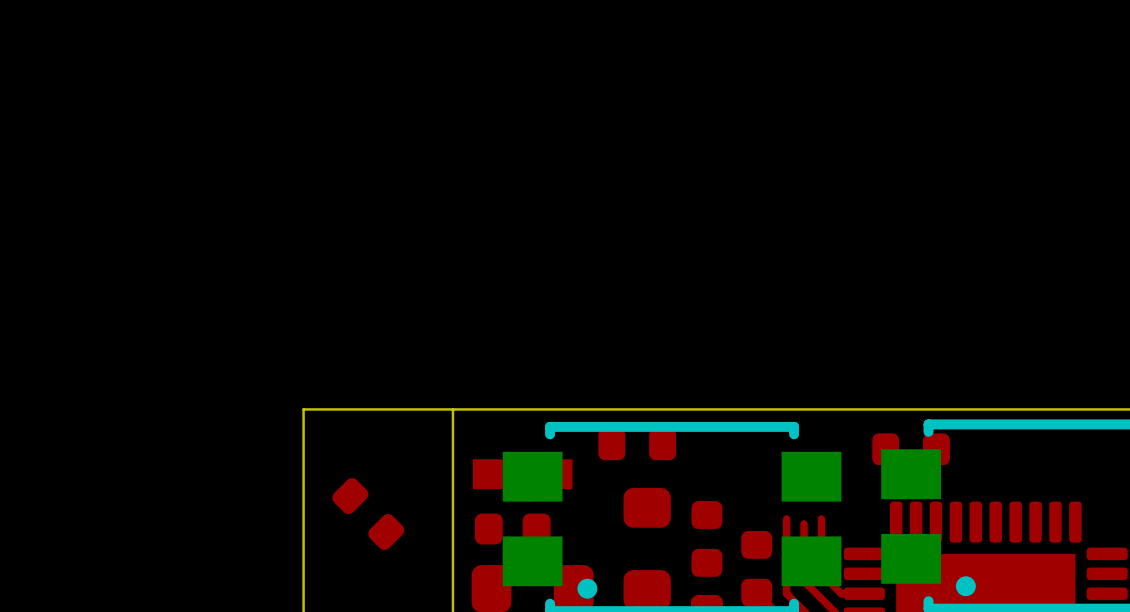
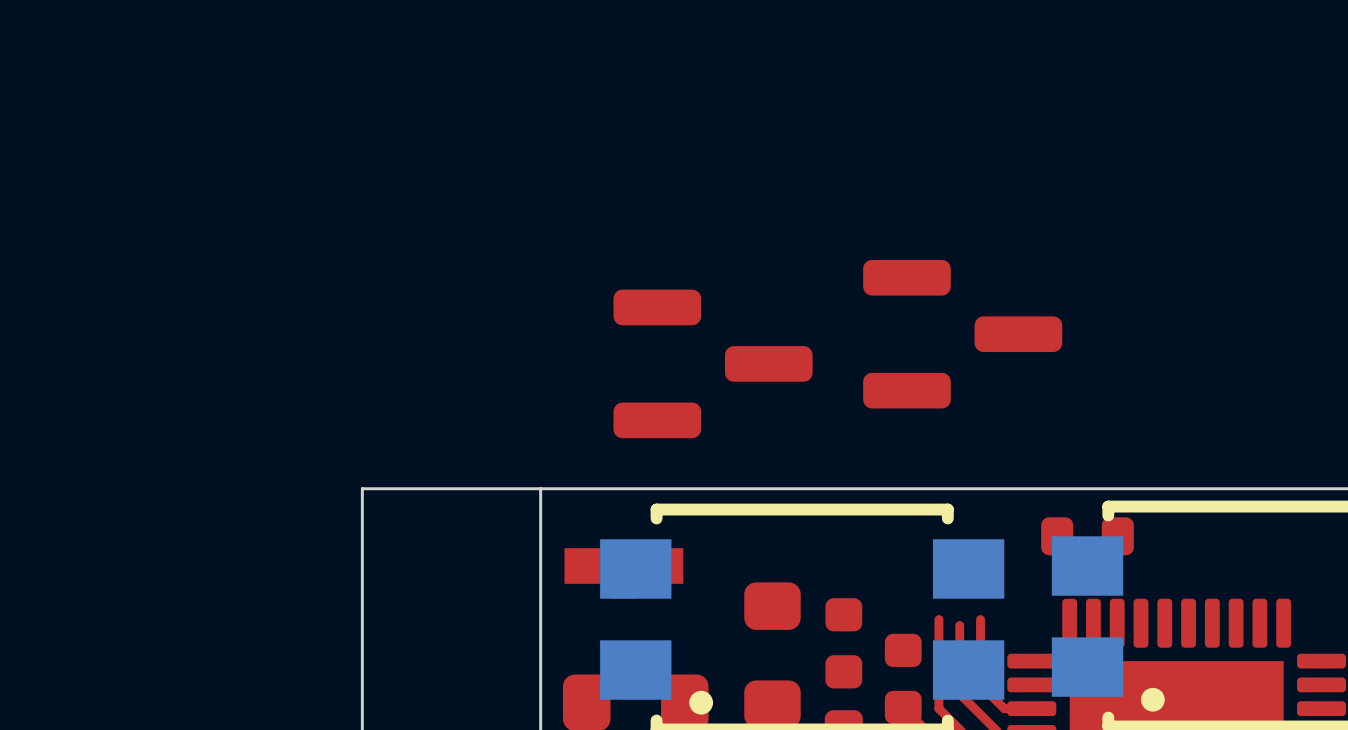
part: none -> (962, 334)
part: none -> (713, 363)
part: (637, 444) -> none
part: (368, 514) -> none
part: (512, 528) -> none

